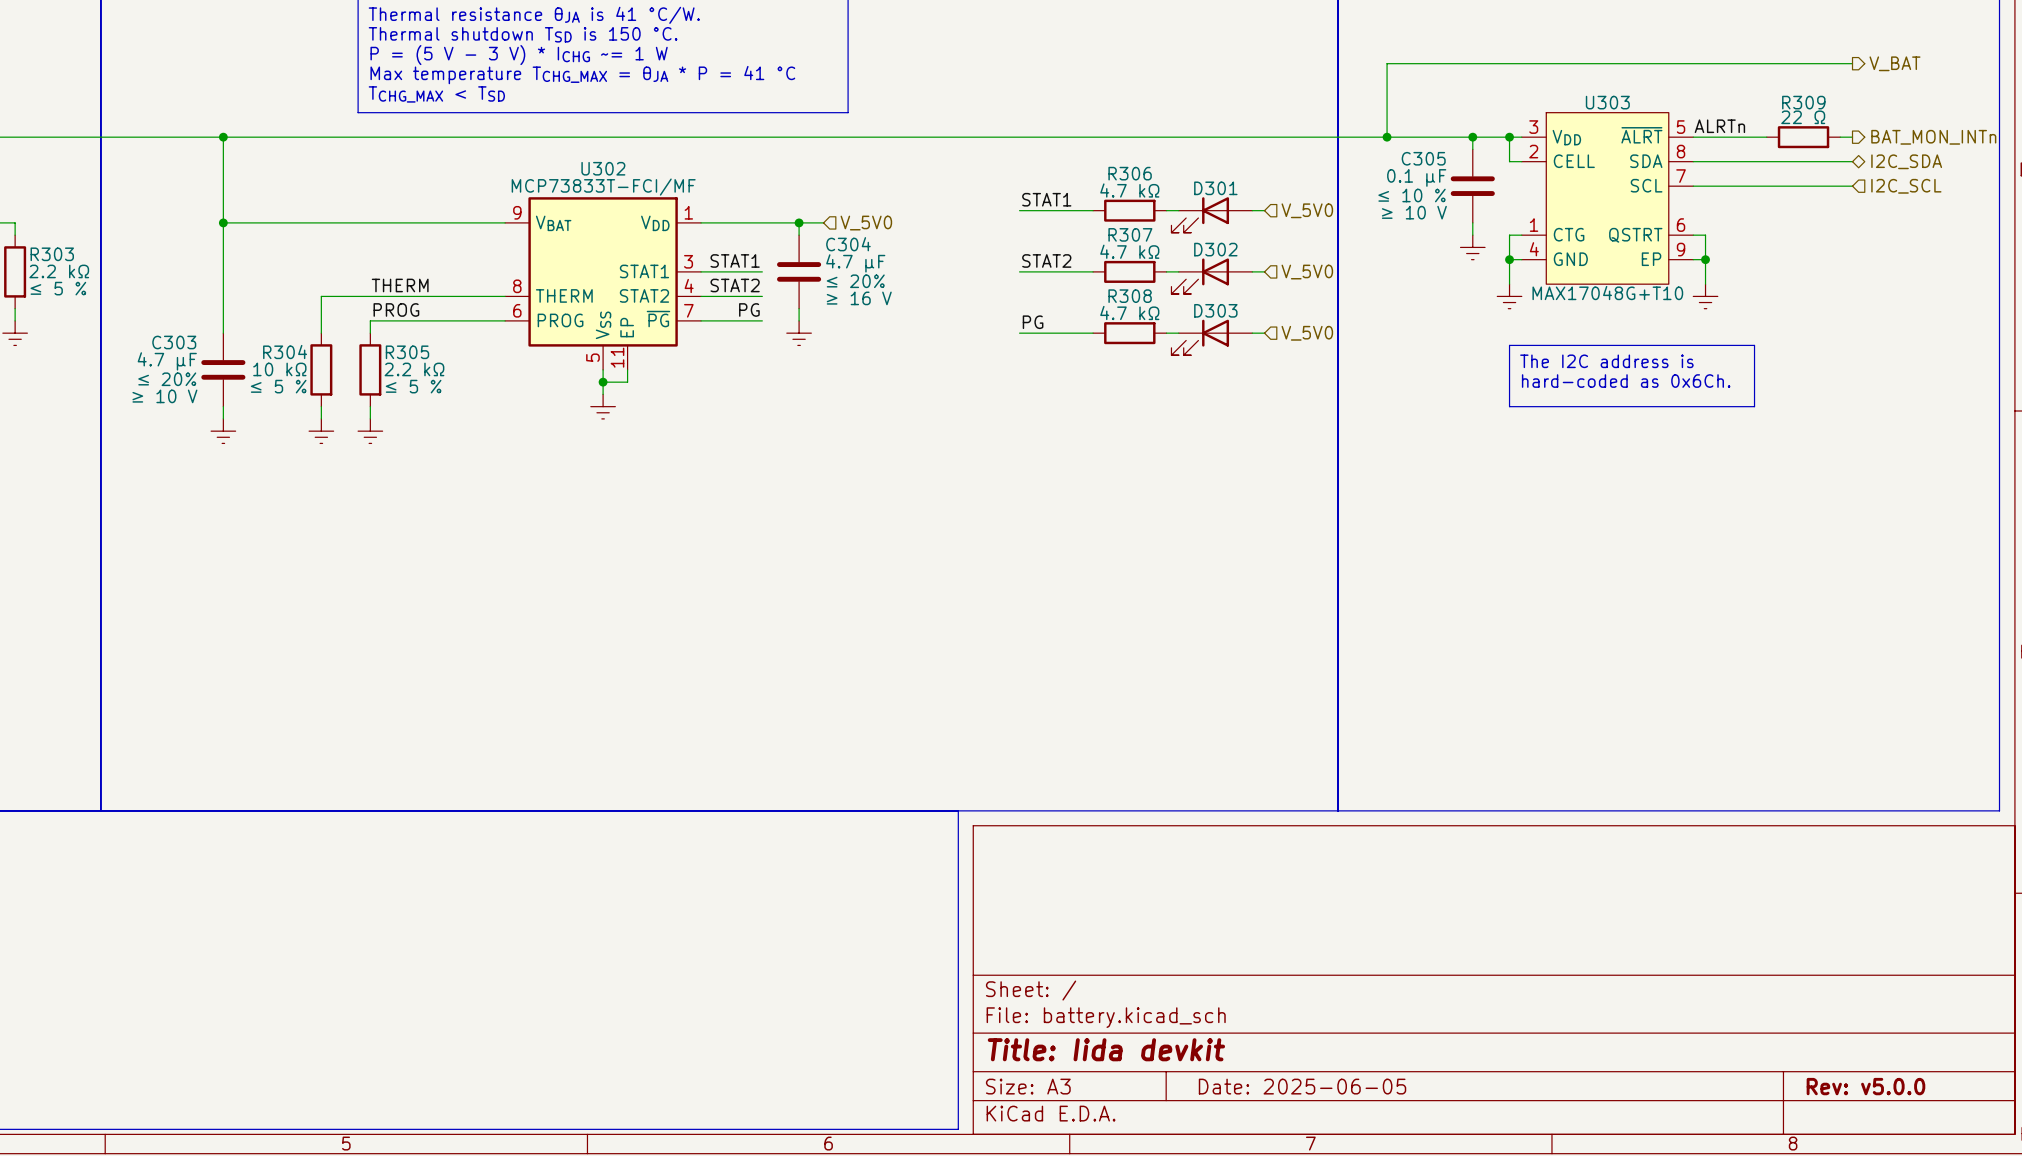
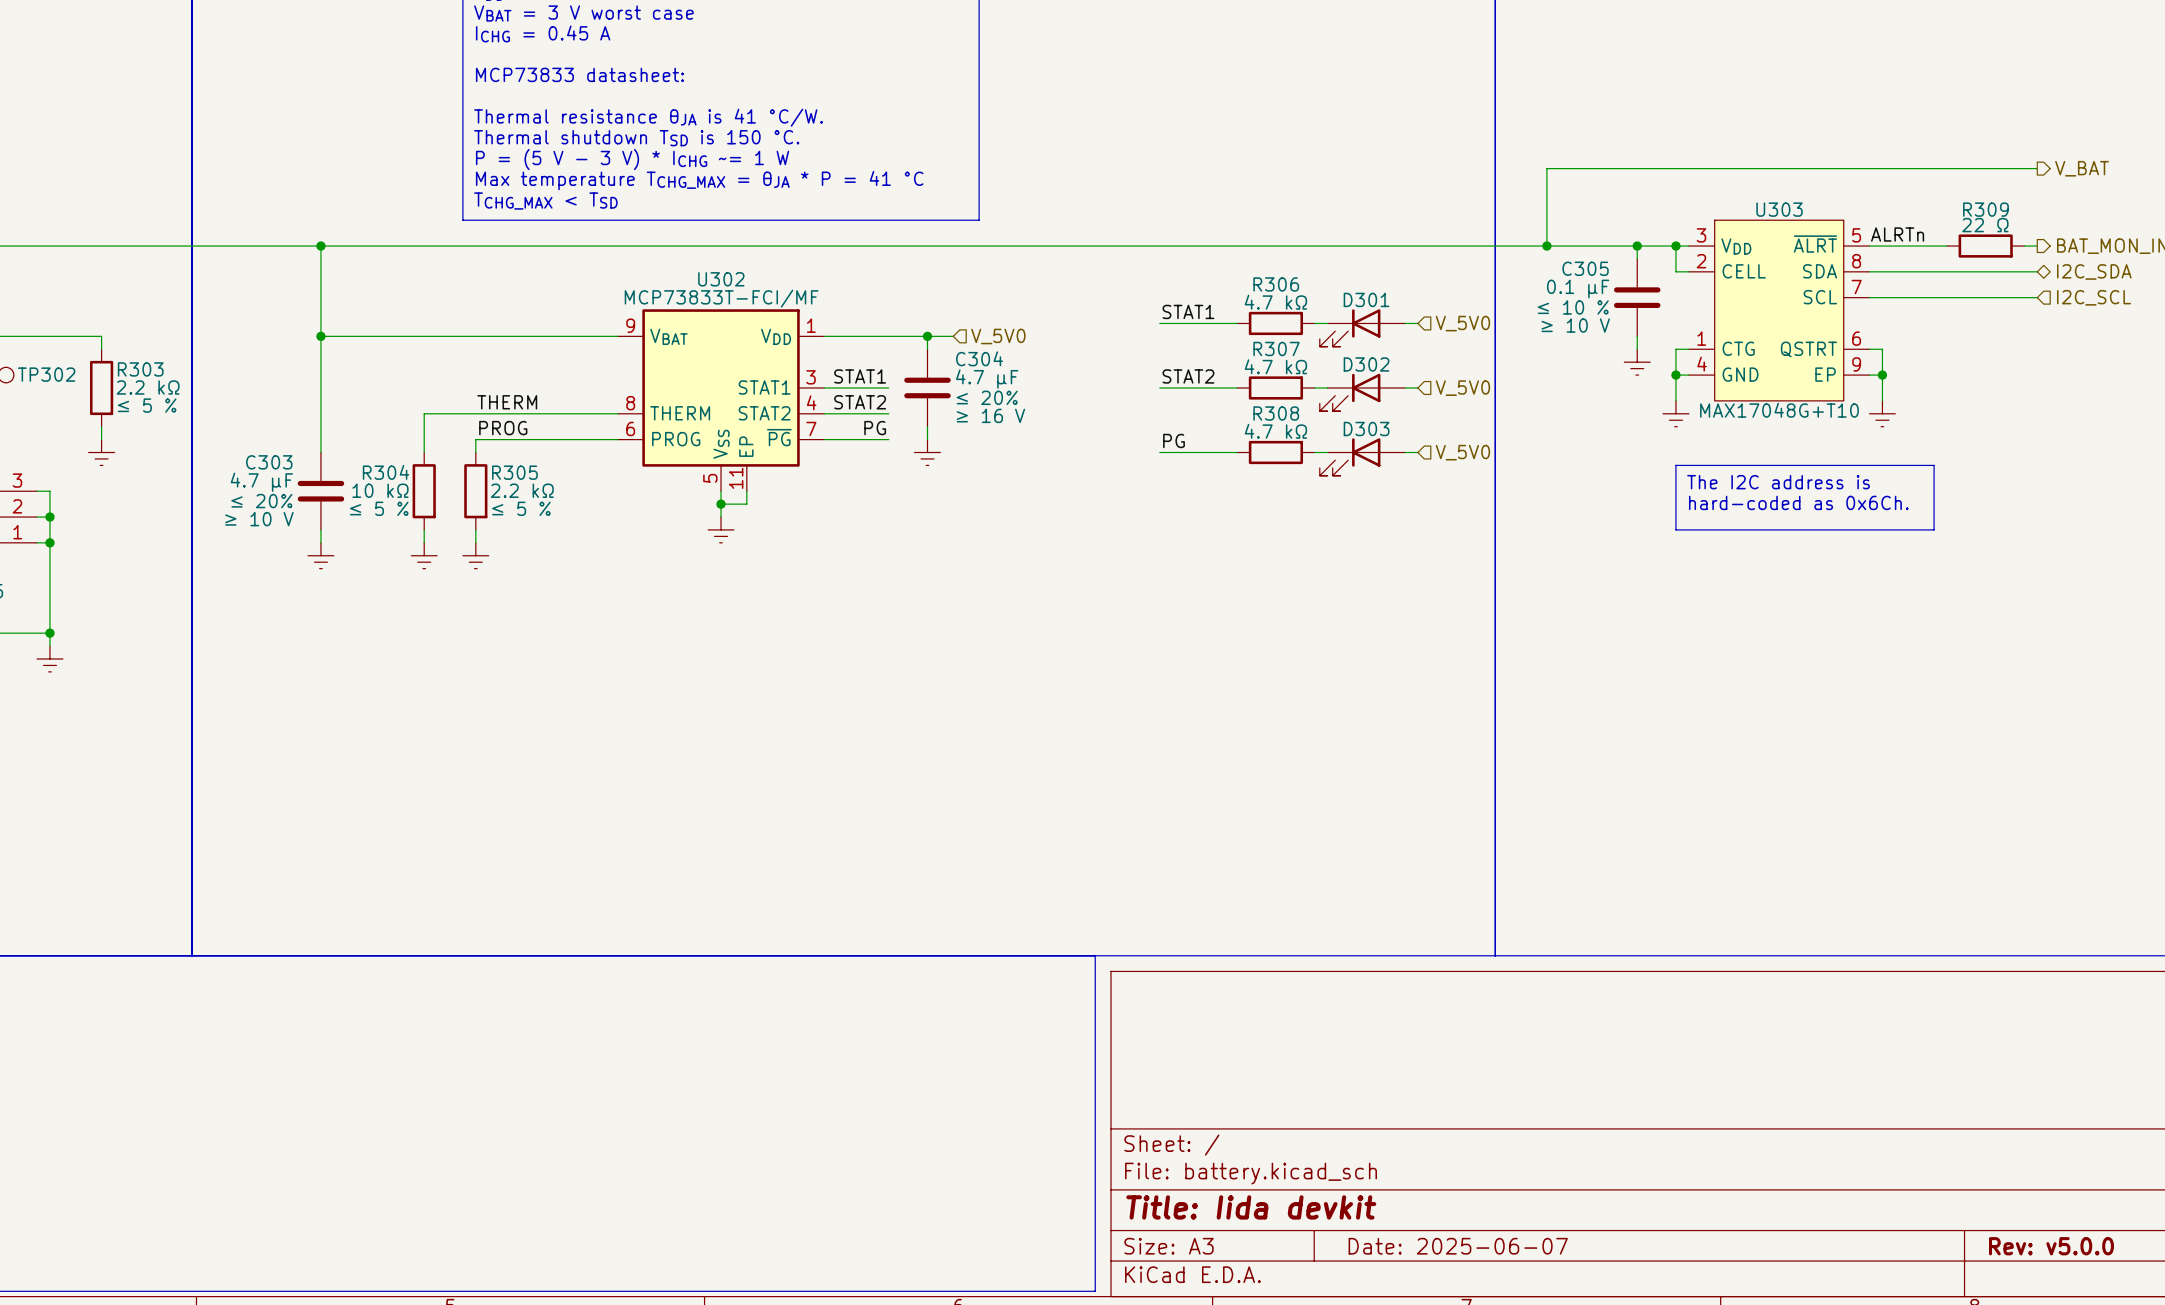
title block: Date: 2025-06-05 (1302, 1086) -> Date: 2025-06-07 (1458, 1246)

